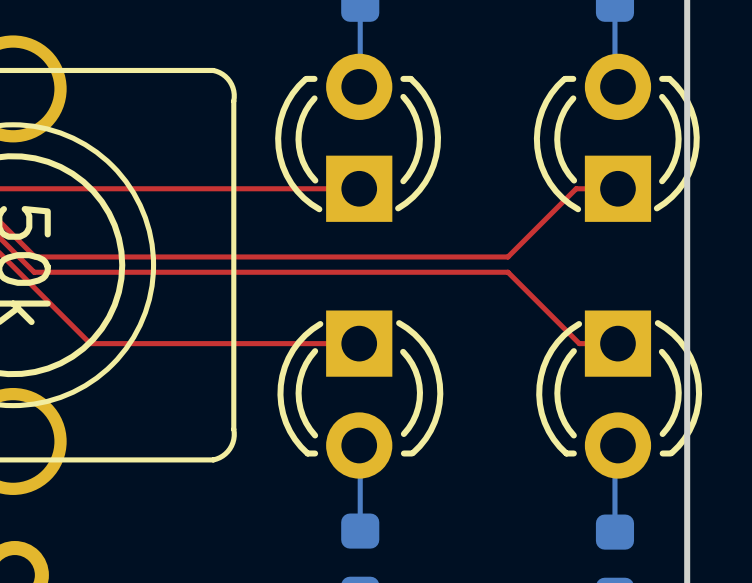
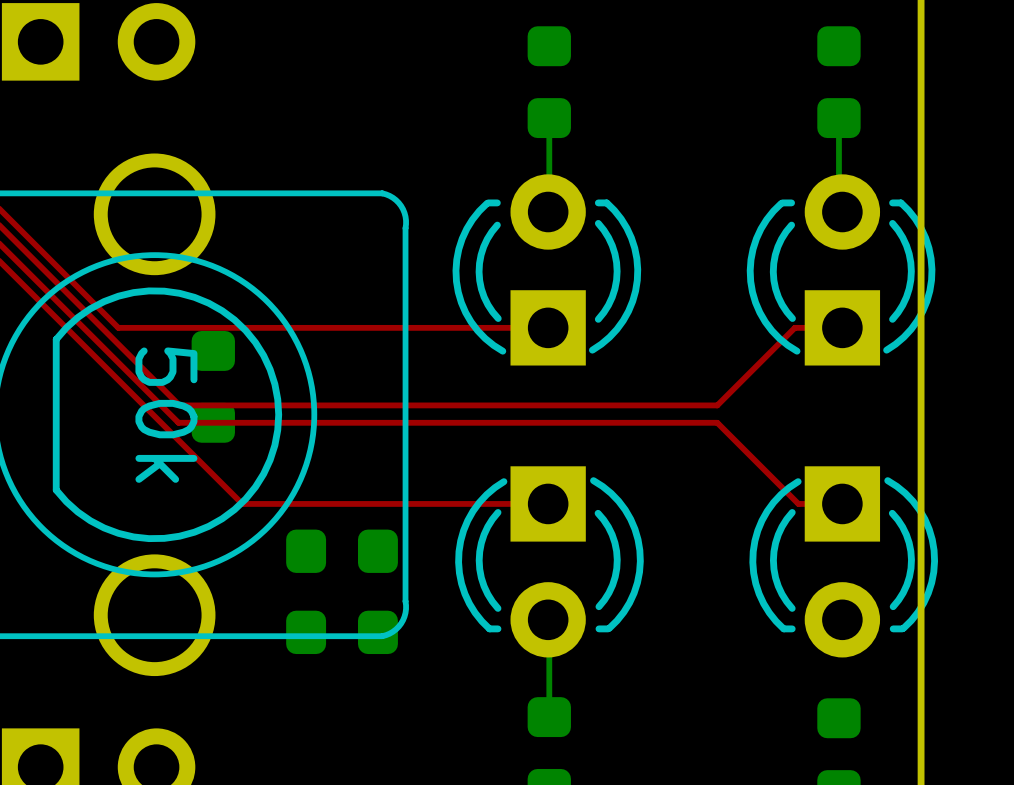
part: none -> (213, 386)
part: none -> (342, 551)
bottom track: (617, 445) (614, 448) (614, 532) -> none
part: none -> (342, 632)

